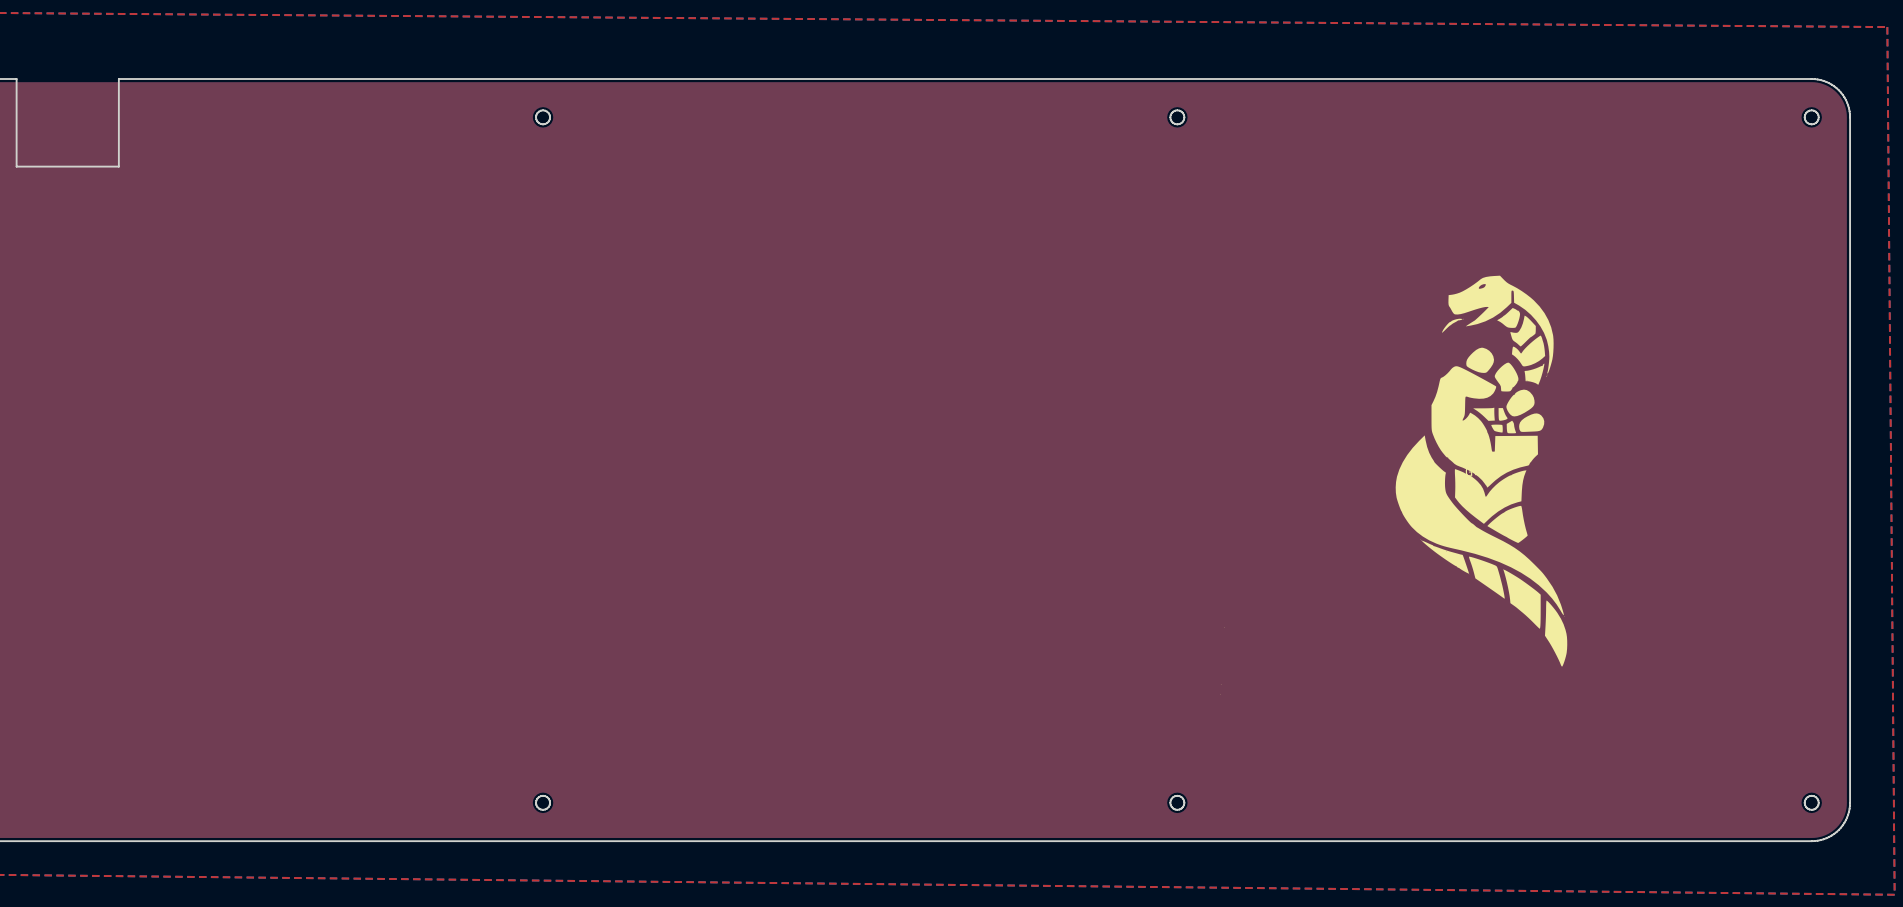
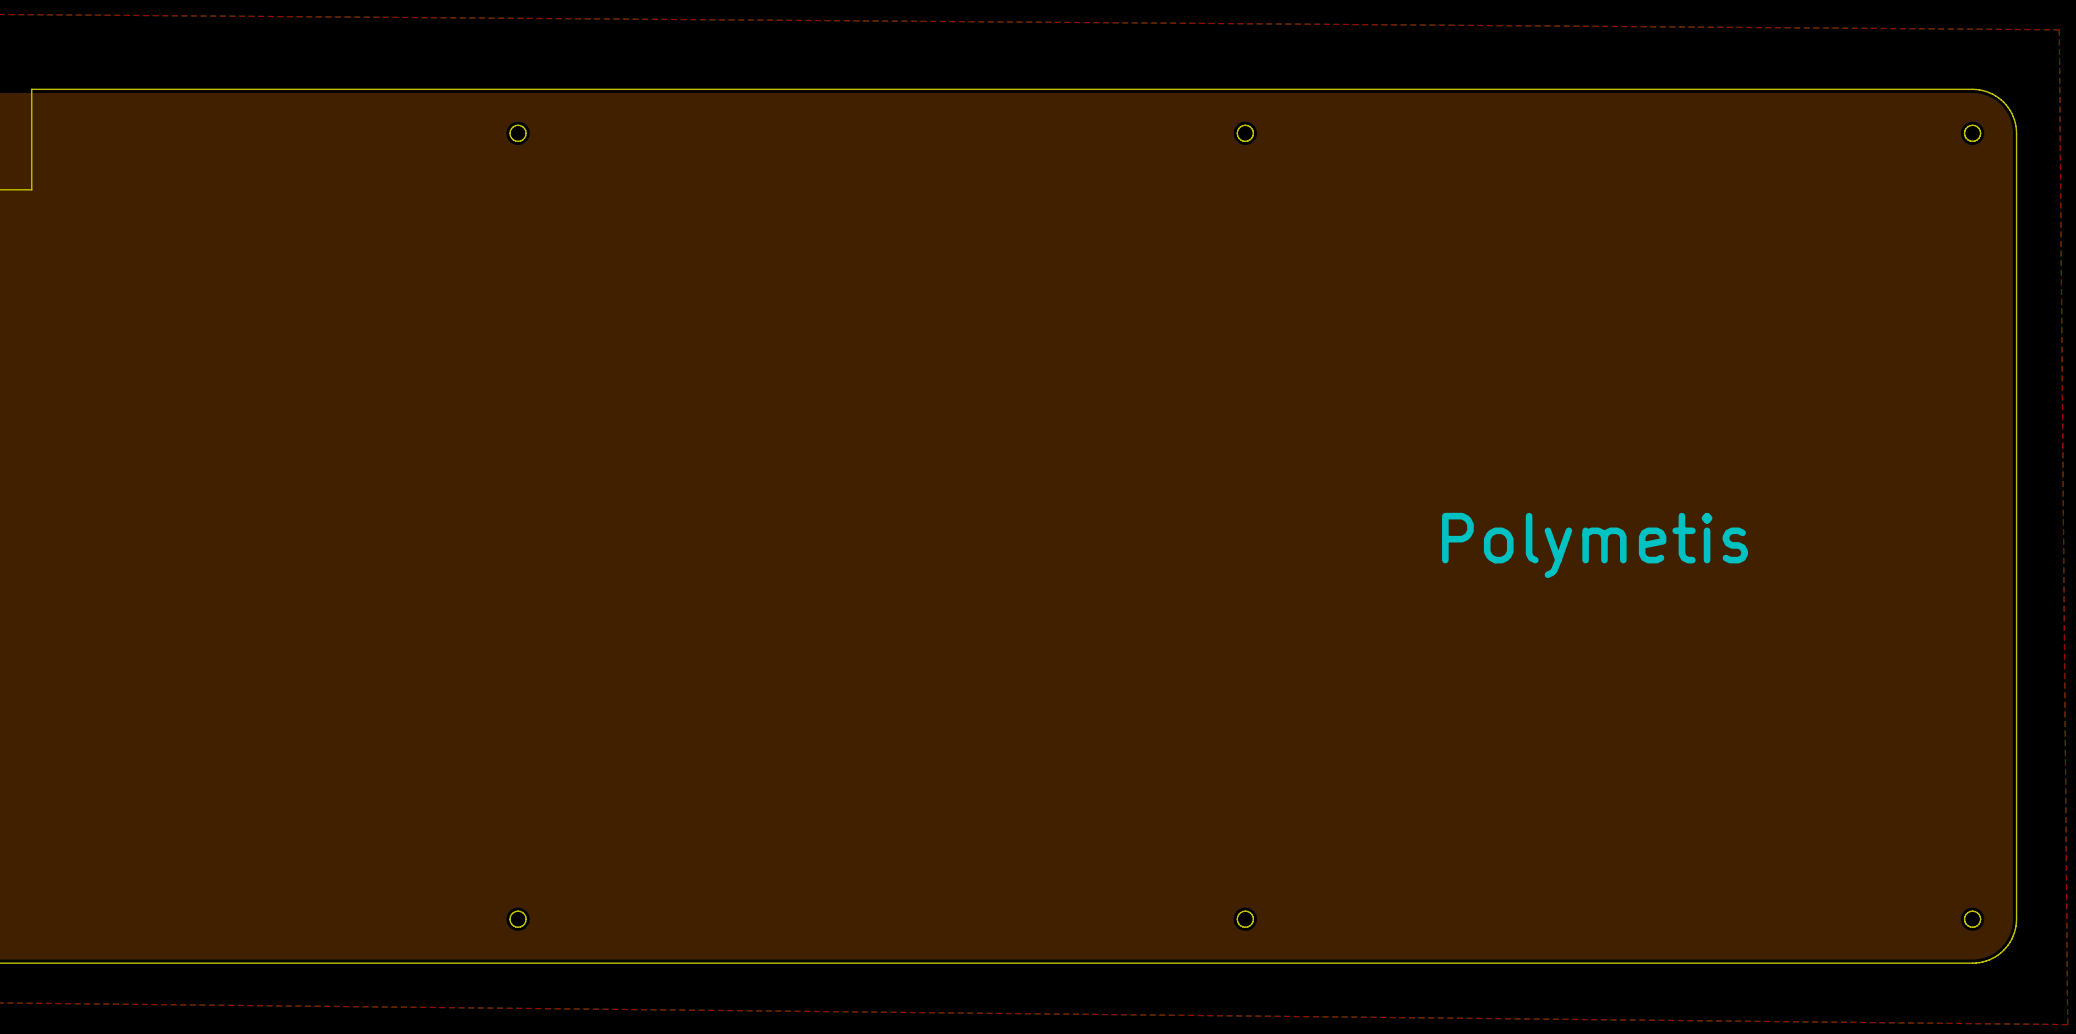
text: none -> Polymetis (1595, 545)
part: (1393, 485) -> none

